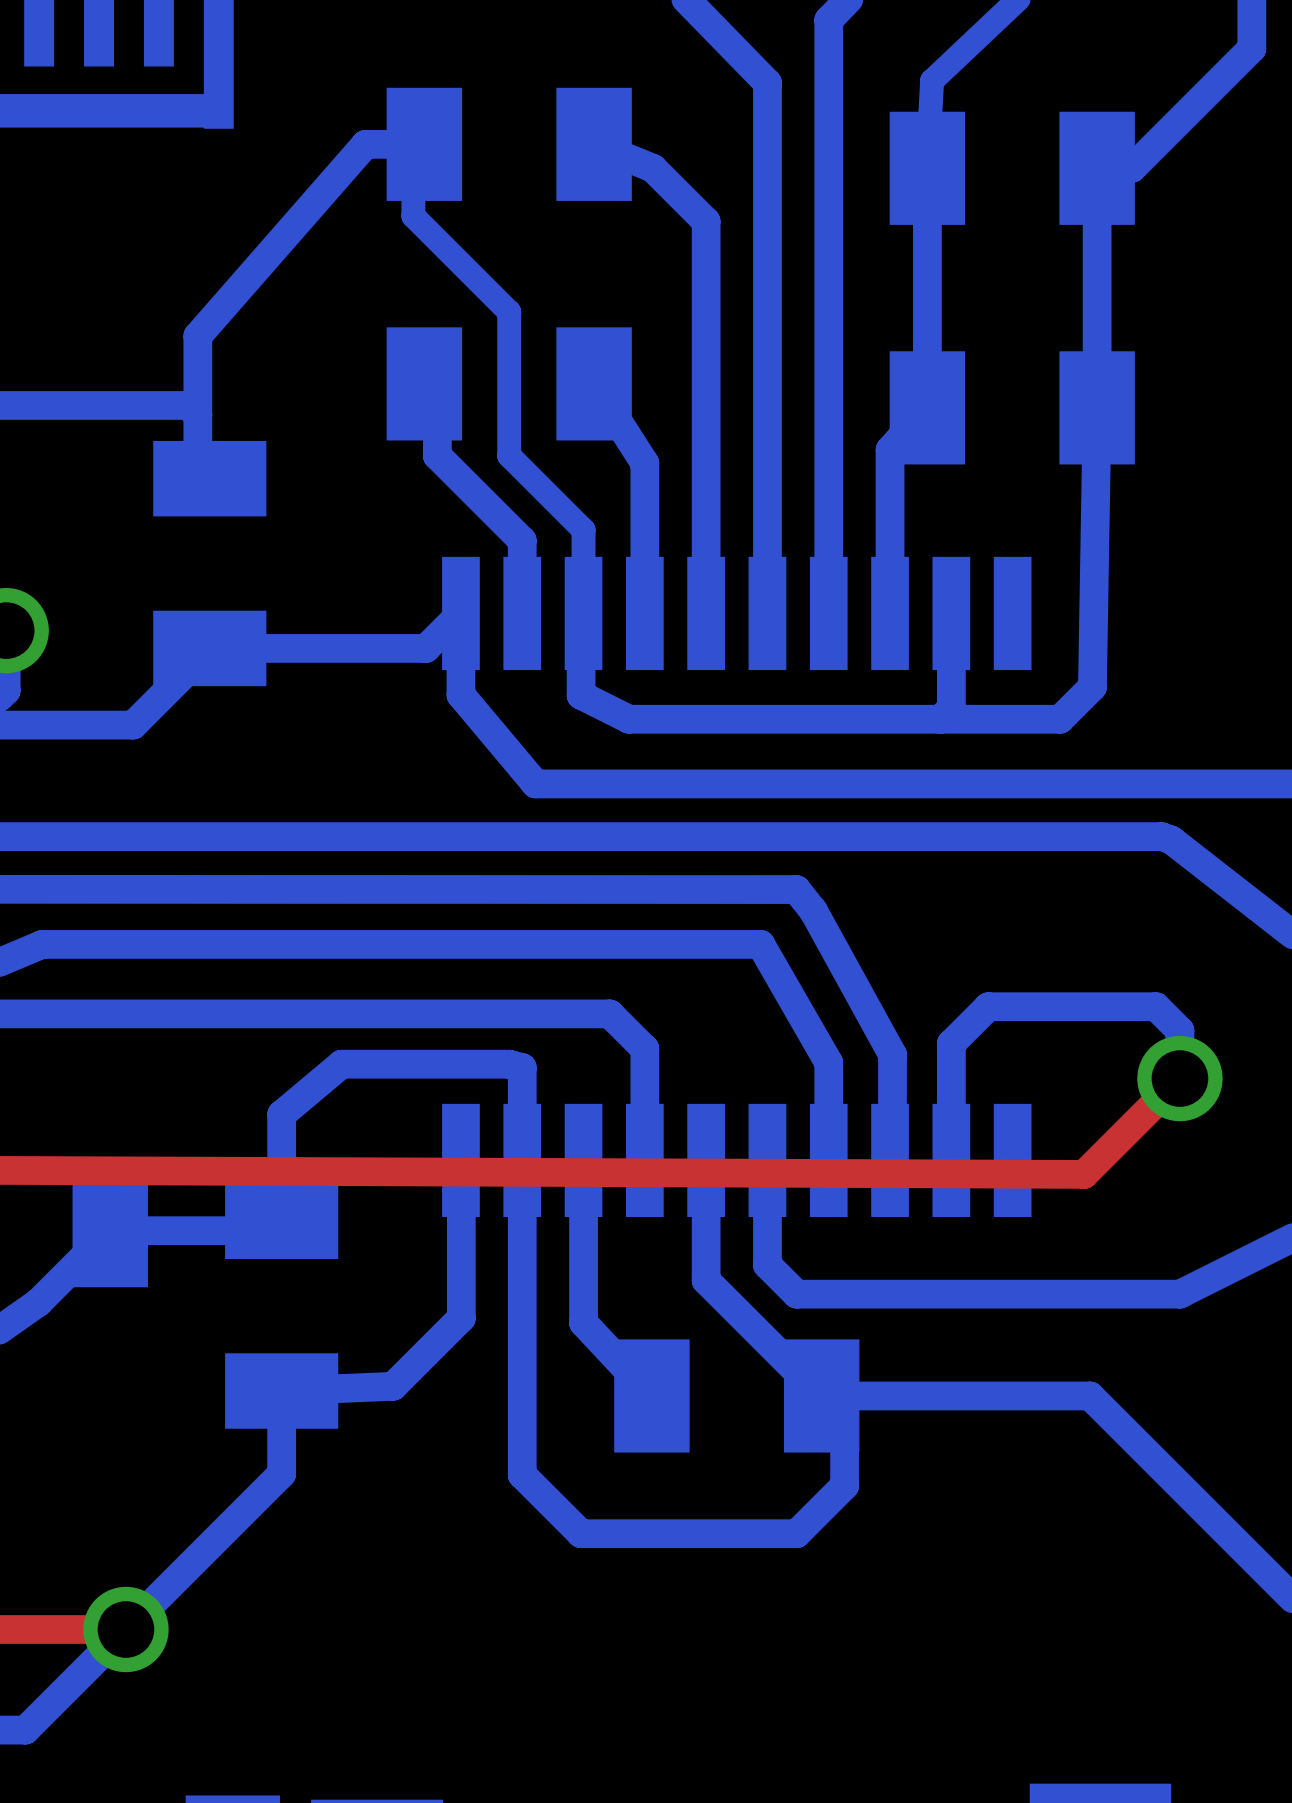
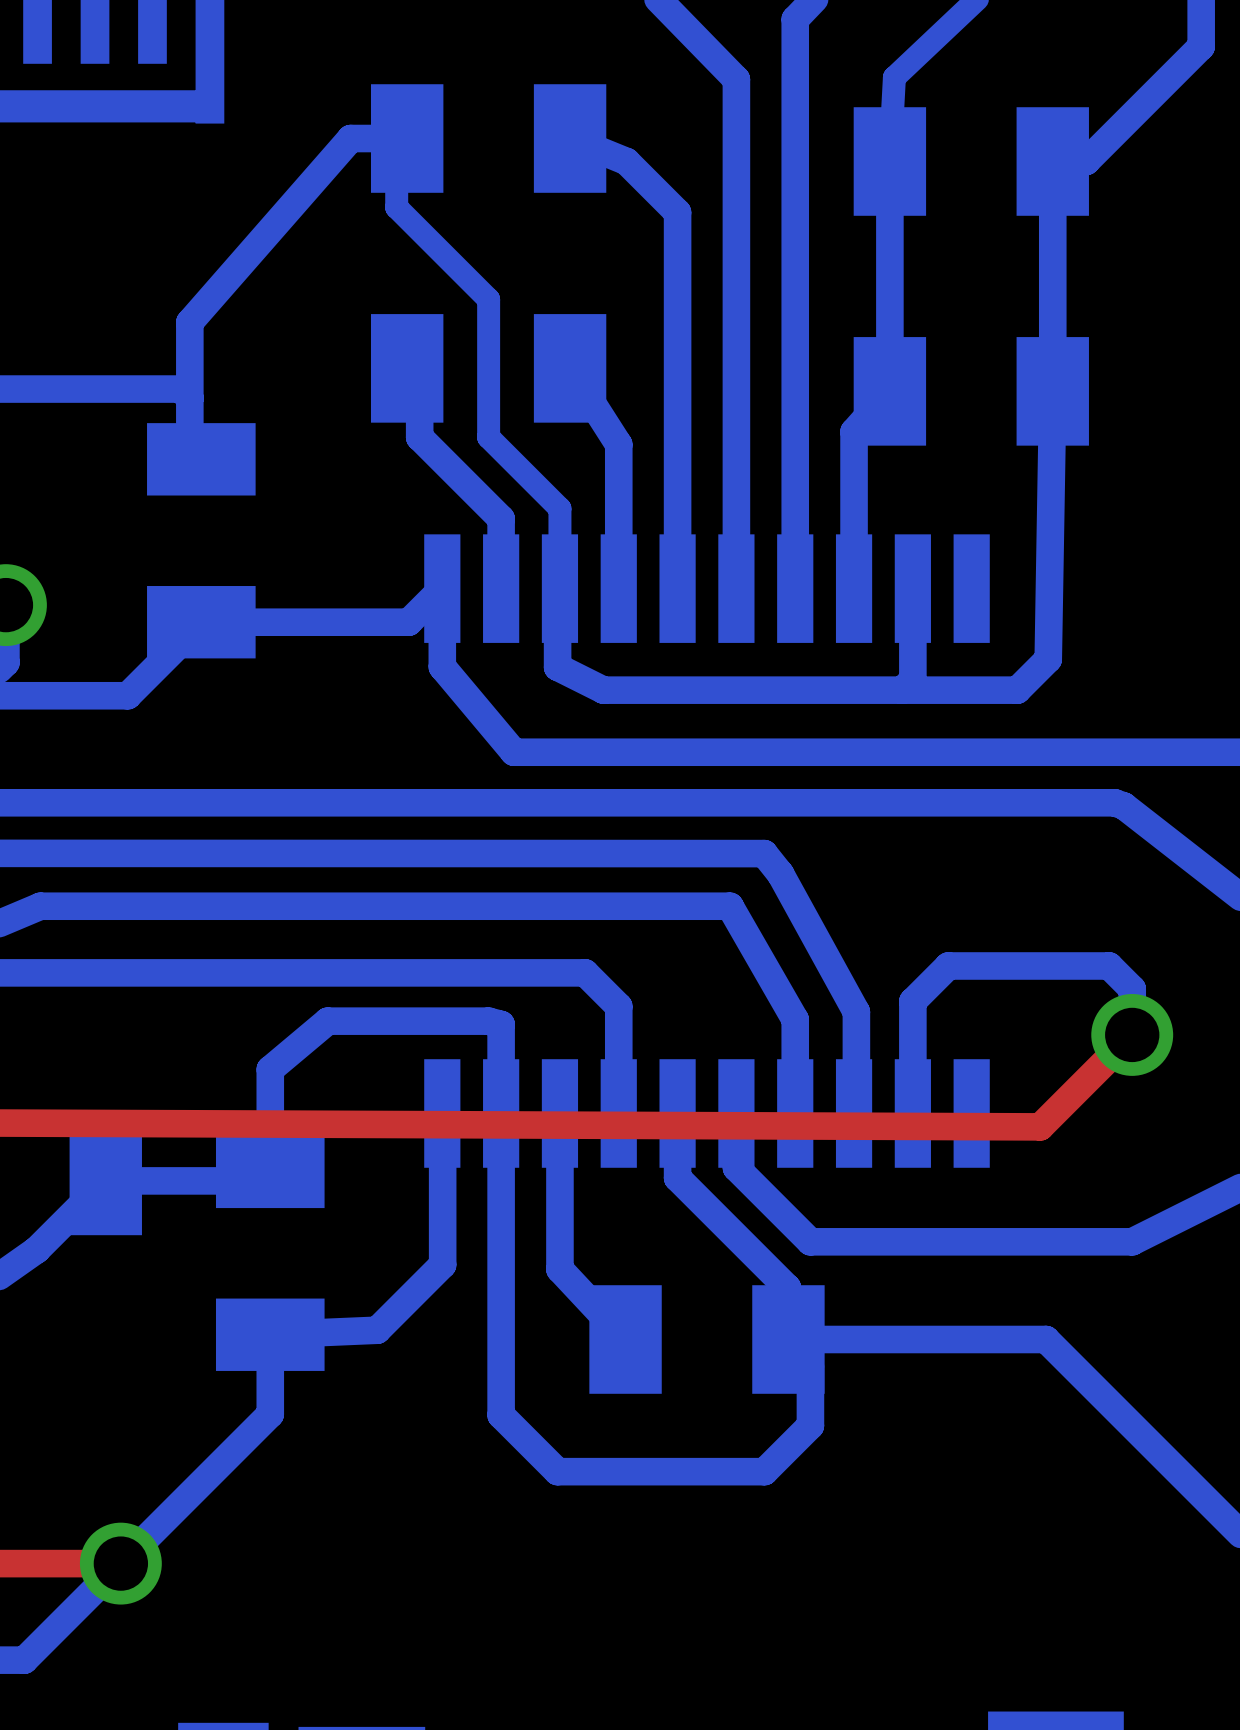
bottom track: (767, 1217) (767, 1264) (796, 1294) (844, 1294) -> (736, 1167) (810, 1241)
bottom track: (706, 1227) (706, 1280) (821, 1395) -> (677, 1177) (787, 1287) (787, 1335)

